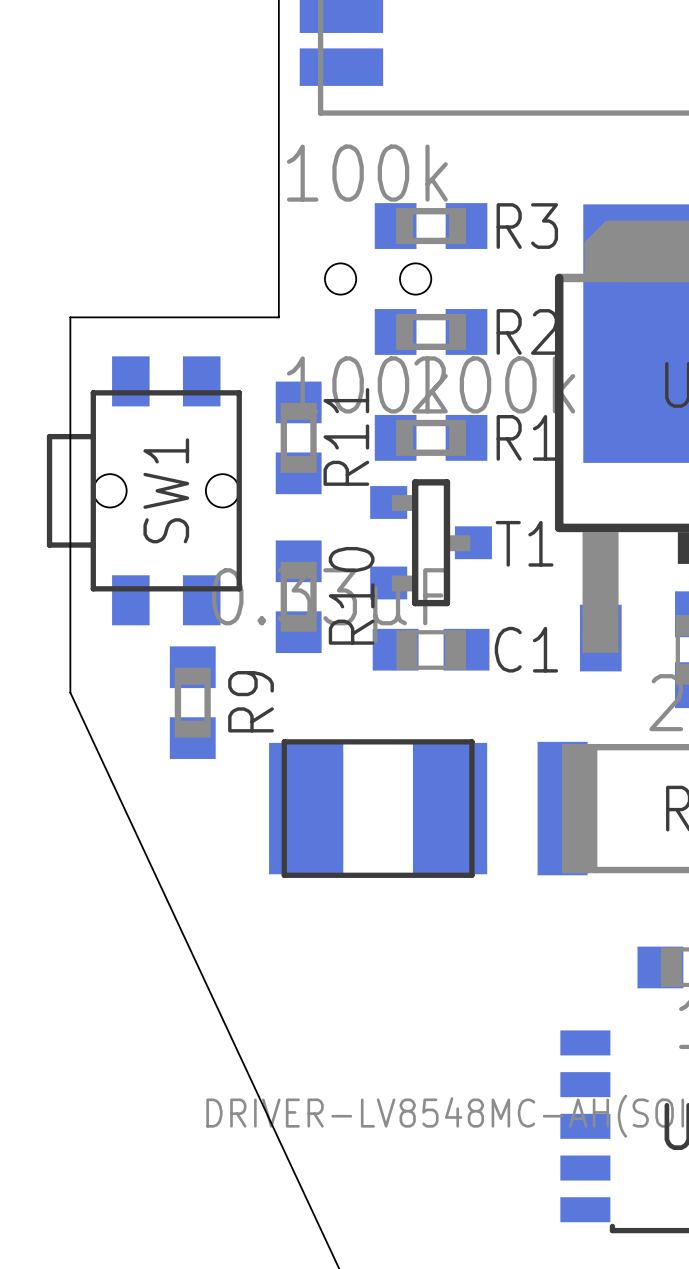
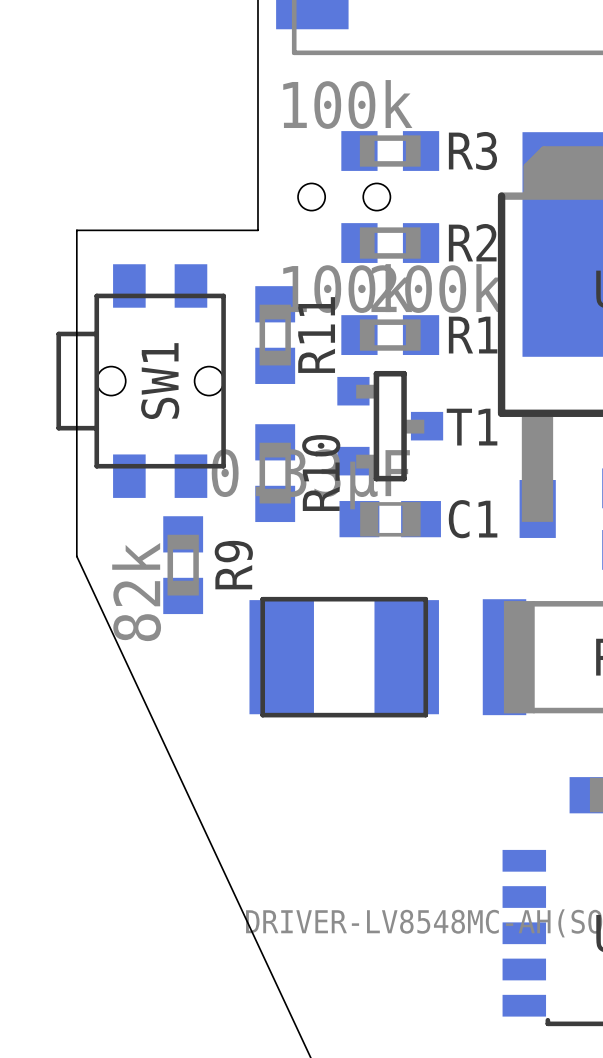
R9 value: none -> 82k (136, 592)

